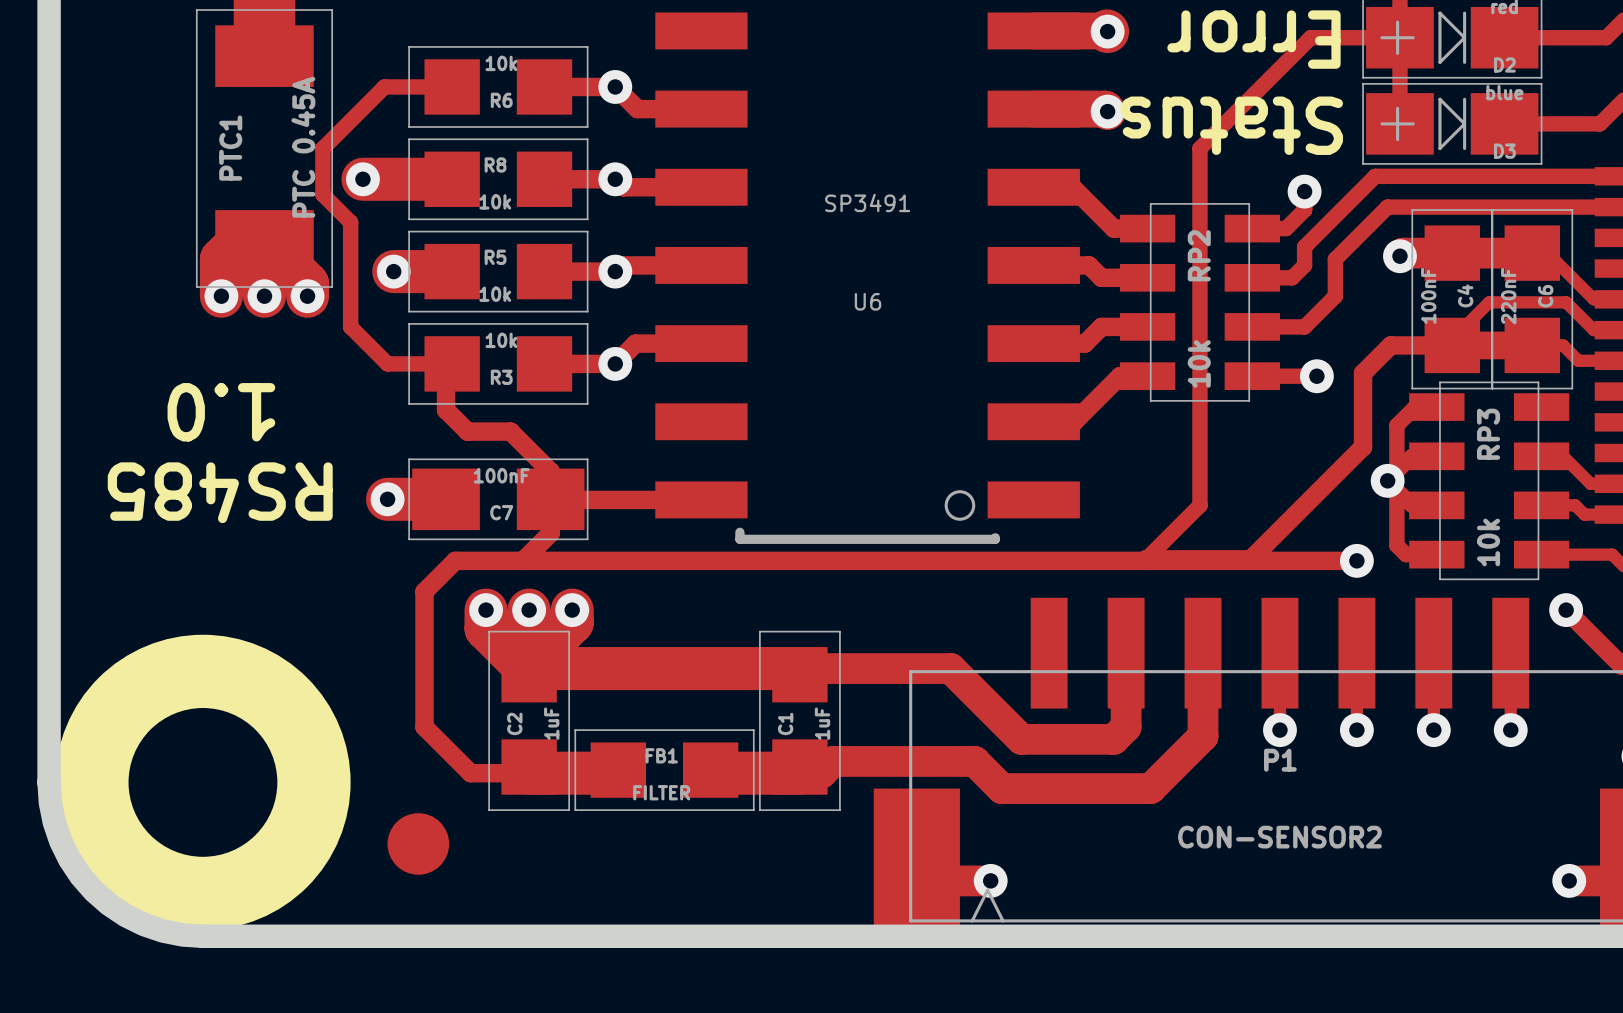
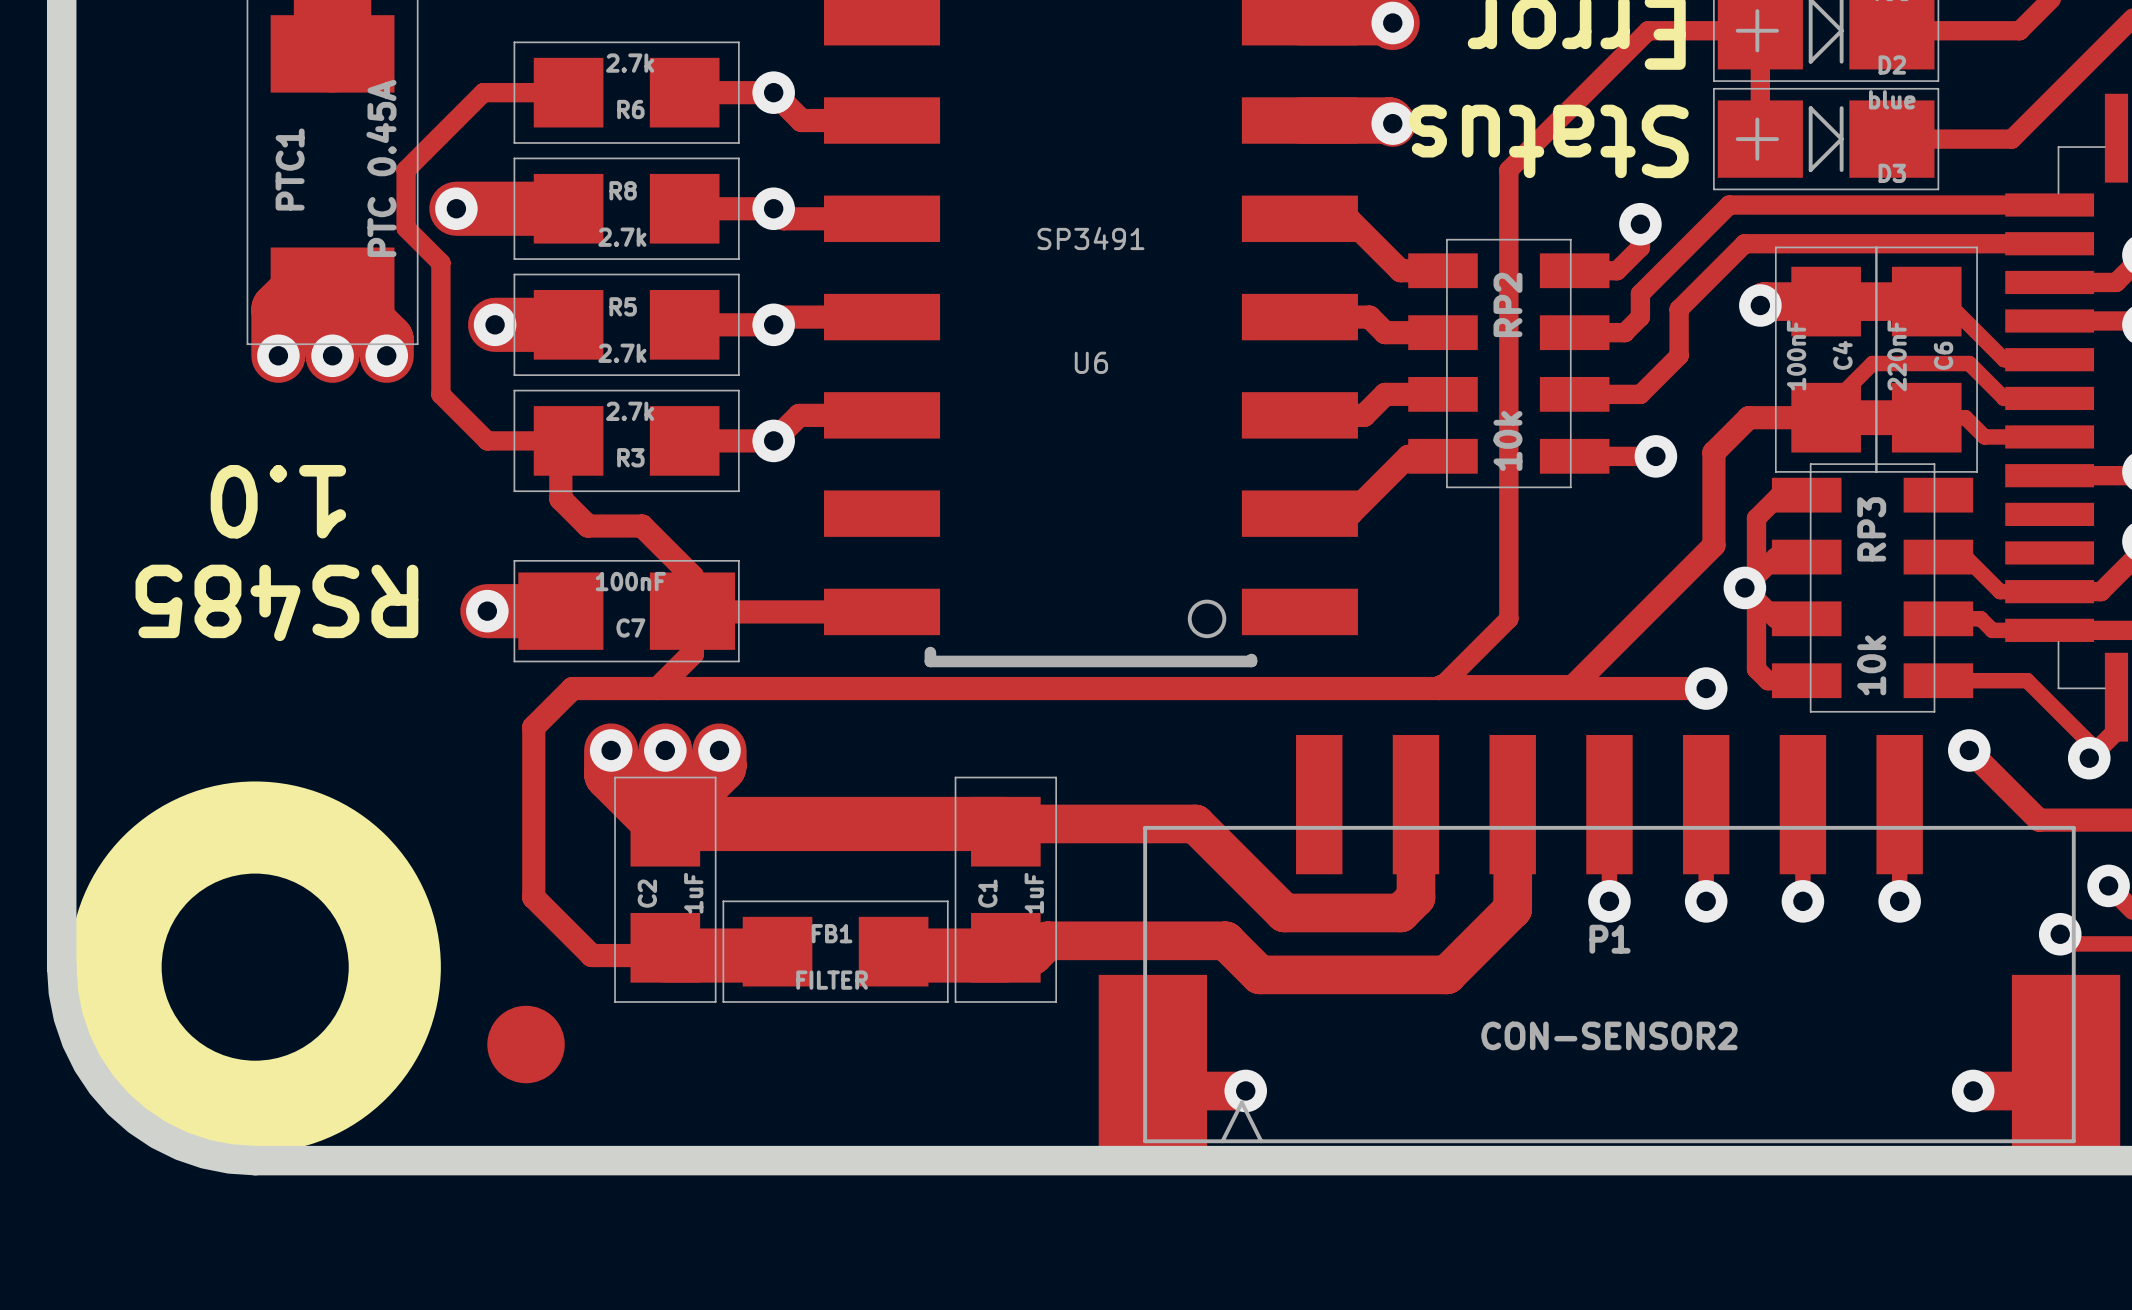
R6 value: 10k (501, 63) -> 2.7k (630, 63)
R8 value: 10k (495, 201) -> 2.7k (622, 237)
R5 value: 10k (495, 294) -> 2.7k (622, 353)
R3 value: 10k (501, 340) -> 2.7k (630, 411)

